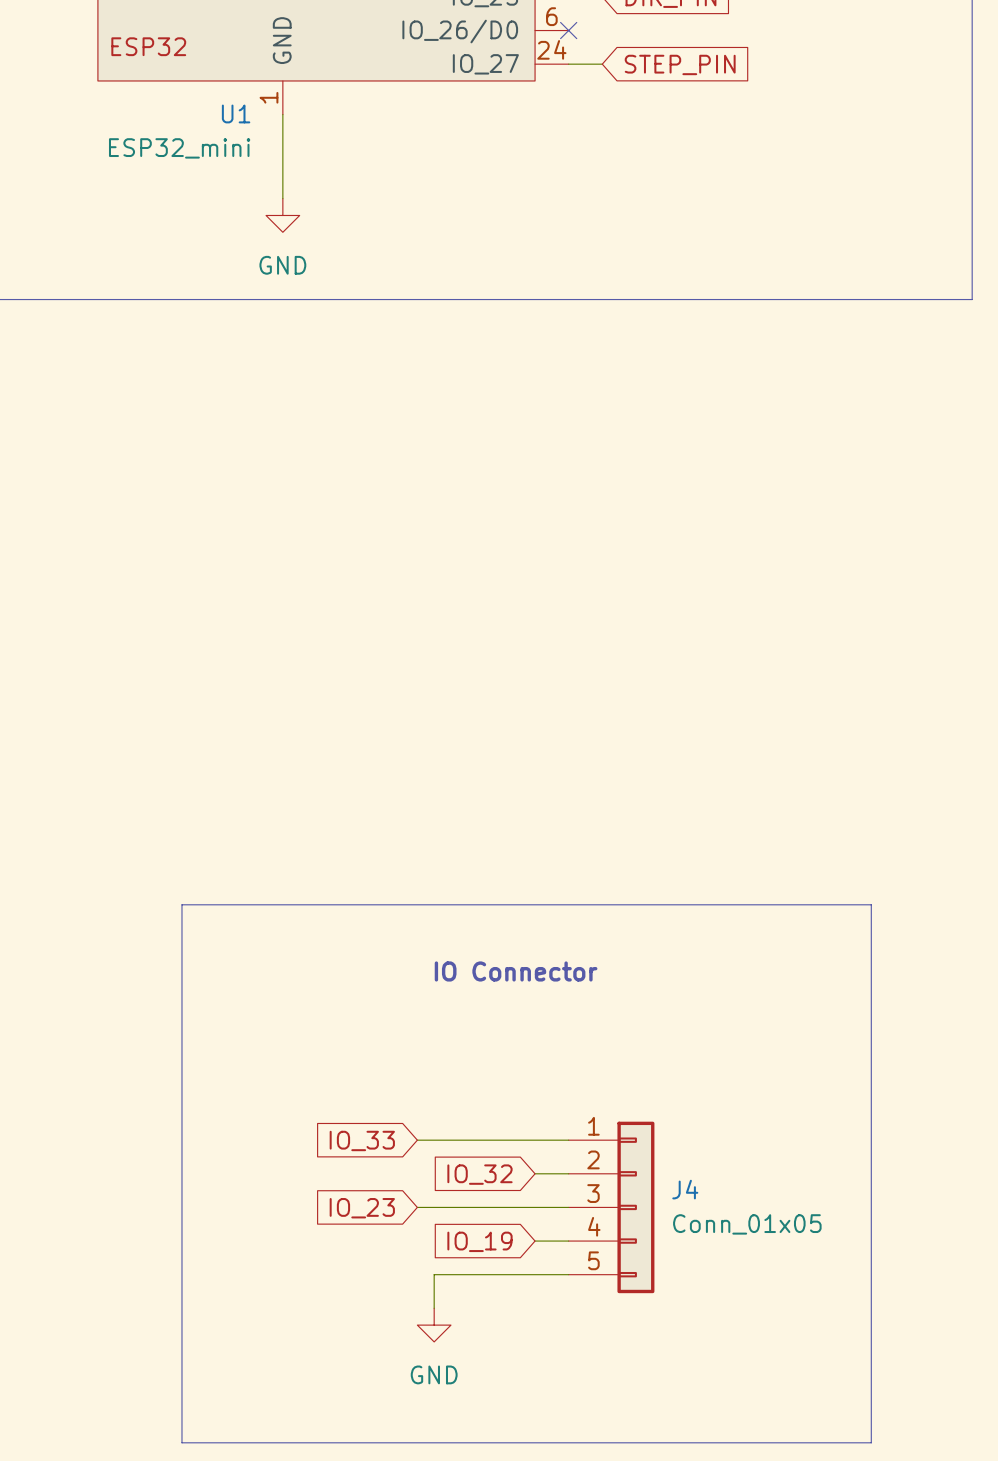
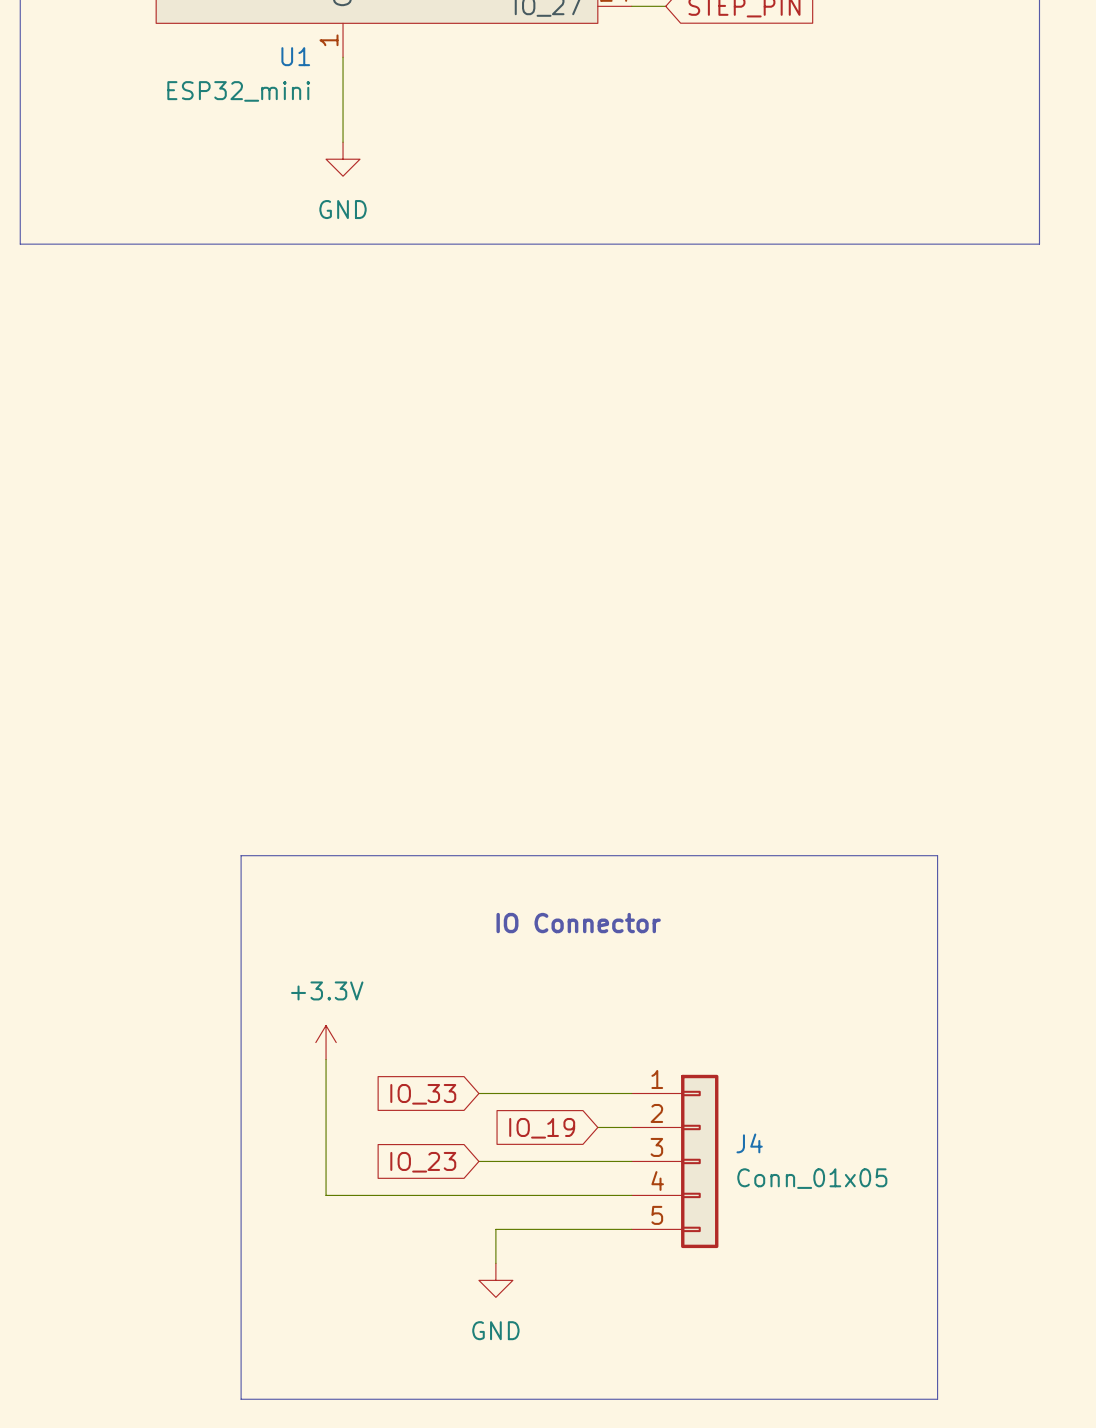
power symbol: none -> +3.3V (326, 1042)
wire: none -> (326, 1059) (326, 1195) (597, 1195)
global label: IO_32 (479, 1174) -> IO_19 (542, 1128)
global label: IO_19 (479, 1241) -> none

